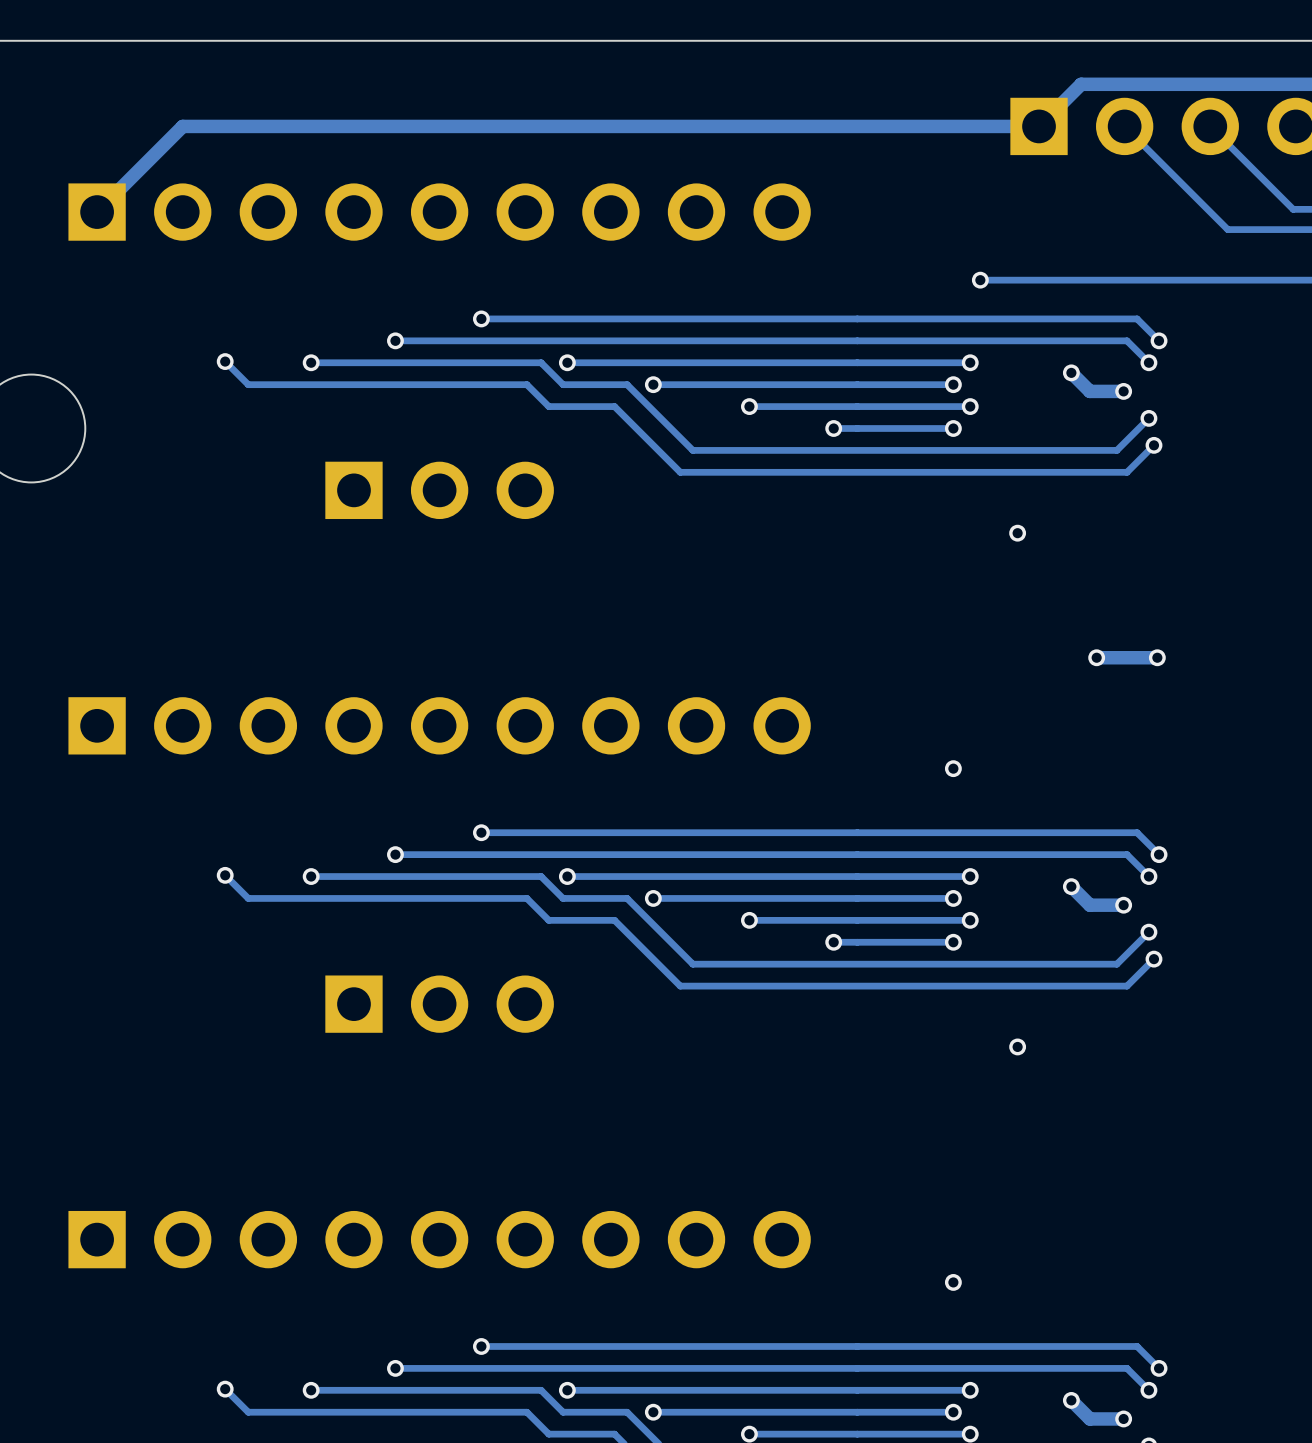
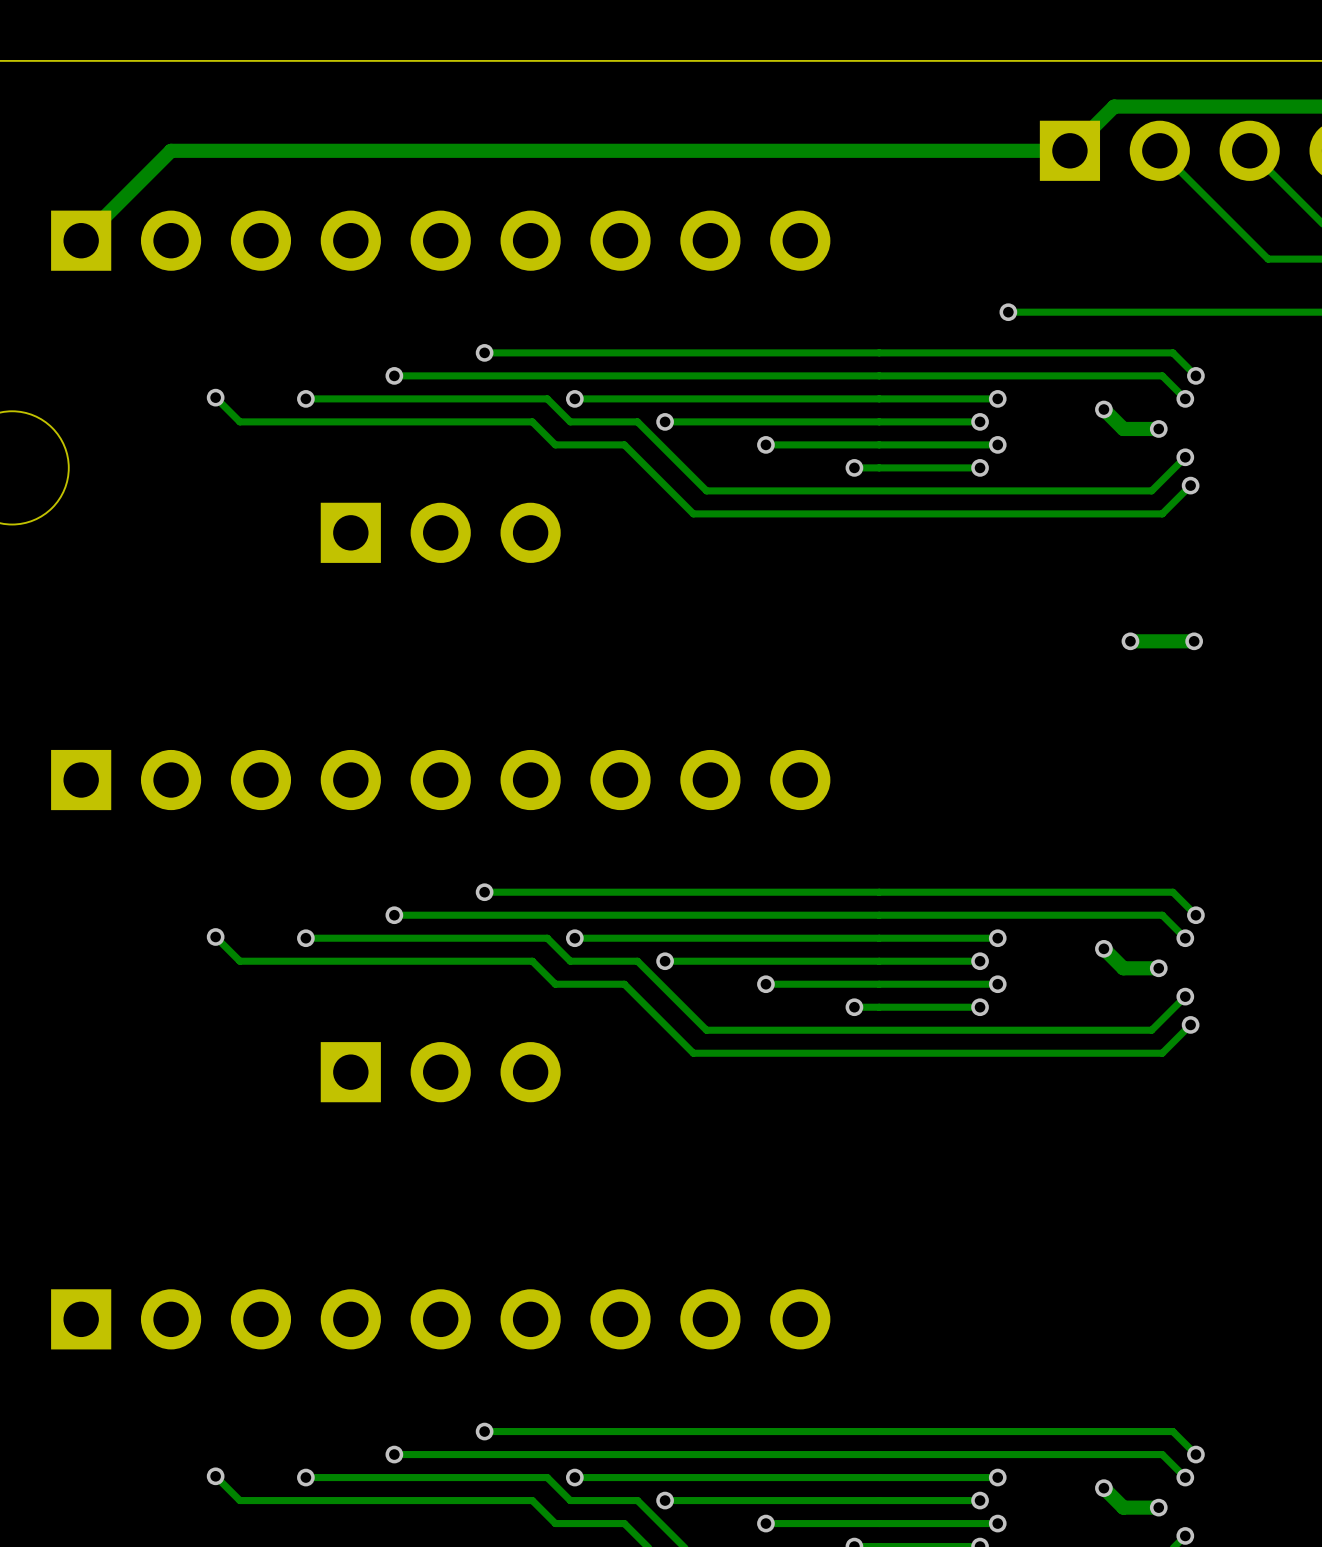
via: (1017, 533) -> none
via: none -> (1130, 641)
via: none -> (1194, 641)
via: (1096, 657) -> none
track: (1157, 657) (1096, 657) -> (1194, 641) (1130, 641)
via: (1157, 657) -> none
via: (953, 768) -> none
via: (1017, 1046) -> none
via: (953, 1282) -> none

